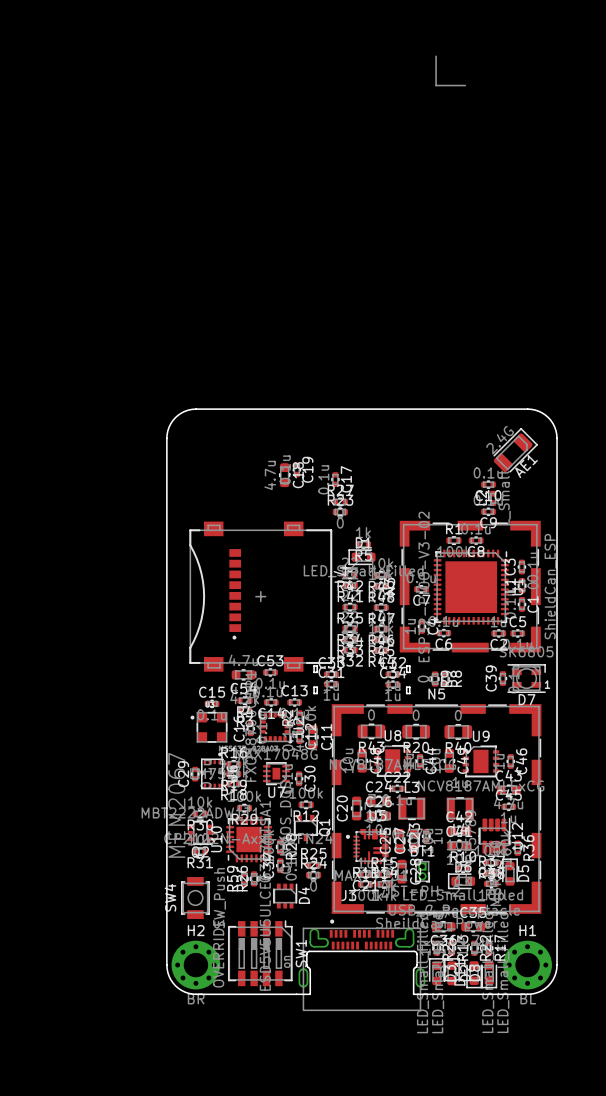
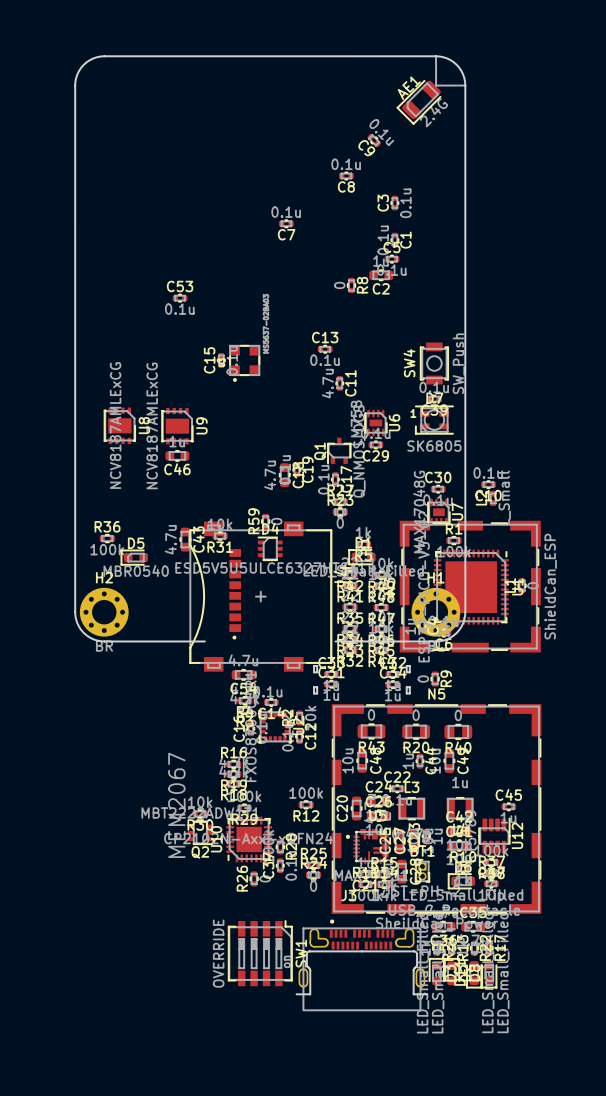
AE1 rotation: 0° (515, 450) -> 180° (419, 102)
AE1 position: (515, 450) -> (419, 102)
C9 rotation: 0° (488, 511) -> 45° clockwise (374, 140)
C9 position: (488, 511) -> (374, 140)
C8 position: (476, 540) -> (346, 175)
C3 position: (521, 567) -> (394, 203)
C7 position: (421, 589) -> (286, 223)
C1 position: (522, 604) -> (394, 240)
C2 footprint: [491, 629, 507, 638] -> [369, 269, 394, 281]
C5 position: (517, 633) -> (391, 259)
board edge: none -> (204, 641) (100, 641) (83, 632) (75, 616) (75, 85) (77, 74) (83, 64) (100, 56) (436, 56) (453, 62) (463, 74) (465, 85) (464, 619) (456, 632) (439, 641) (335, 641)
C53 position: (270, 672) -> (180, 298)
C39 rotation: 0° (502, 678) -> 90° clockwise (434, 399)
C39 position: (502, 678) -> (434, 399)
D7 rotation: 0° (526, 678) -> 180° (434, 420)
D7 position: (526, 678) -> (434, 420)
R8 position: (445, 679) -> (351, 285)
C13 position: (294, 702) -> (325, 349)
C15 rotation: 0° (212, 703) -> 90° clockwise (221, 360)
C15 position: (212, 703) -> (221, 360)
C11 footprint: [307, 725, 319, 750] -> [335, 375, 344, 391]
part rotation: 0° (208, 727) -> 90° counterclockwise (244, 363)
part position: (208, 727) -> (244, 363)
U6 footprint: [201, 752, 224, 790] -> [364, 409, 388, 437]
C46 footprint: [506, 754, 515, 769] -> [165, 450, 190, 462]
U8 rotation: 0° (392, 760) -> 90° clockwise (119, 425)
U8 position: (392, 760) -> (119, 425)
U9 rotation: 0° (480, 761) -> 90° clockwise (177, 426)
U9 position: (480, 761) -> (177, 426)
U7 rotation: 0° (276, 773) -> 90° counterclockwise (438, 512)
U7 position: (276, 773) -> (438, 512)
C29 rotation: 0° (195, 774) -> 90° clockwise (375, 444)
C29 position: (195, 774) -> (375, 444)
C30 rotation: 0° (299, 778) -> 90° clockwise (438, 489)
C30 position: (299, 778) -> (438, 489)
C43 rotation: 0° (508, 790) -> 90° clockwise (185, 539)
C43 position: (508, 790) -> (185, 539)
Q1 rotation: 0° (305, 827) -> 180° (339, 450)
Q1 position: (305, 827) -> (339, 450)
R36 rotation: 0° (517, 848) -> 90° clockwise (107, 538)
R36 position: (517, 848) -> (107, 538)
R31 position: (200, 851) -> (220, 536)
D5 rotation: 0° (510, 872) -> 90° counterclockwise (134, 557)
D5 position: (510, 872) -> (134, 557)
R59 position: (244, 878) -> (265, 521)
D4 rotation: 0° (285, 896) -> 90° counterclockwise (270, 548)
D4 position: (285, 896) -> (270, 548)
SW4 position: (195, 898) -> (434, 363)
H2 position: (195, 965) -> (104, 612)
H1 position: (527, 965) -> (435, 612)
board edge: (296, 994) (192, 994) (175, 985) (167, 968) (166, 438) (169, 427) (175, 417) (192, 409) (527, 409) (542, 413) (554, 427) (557, 438) (556, 972) (548, 985) (531, 994) (427, 994) -> none

